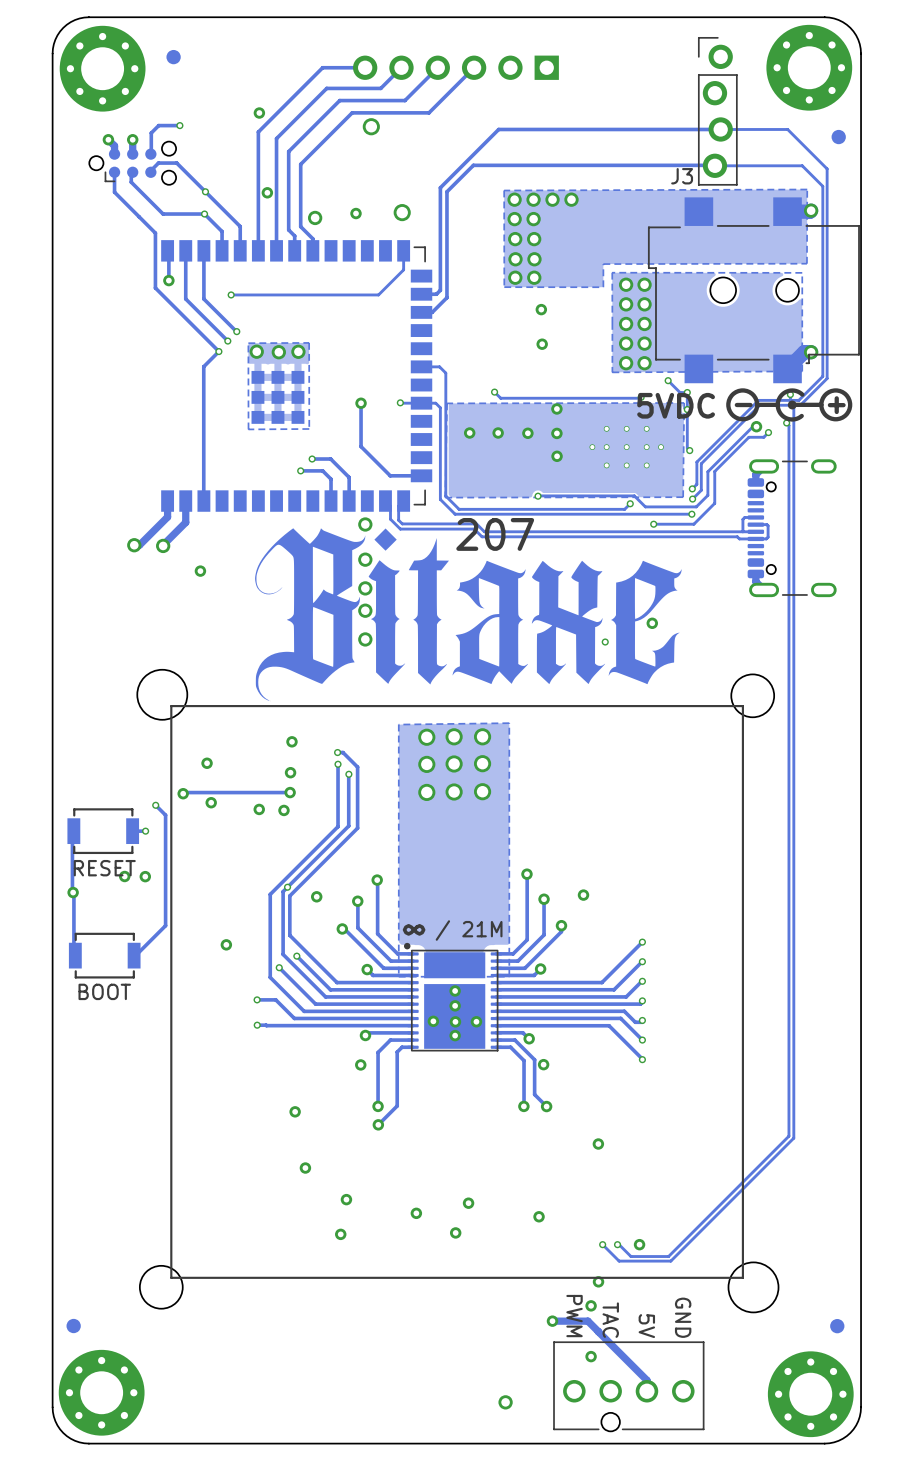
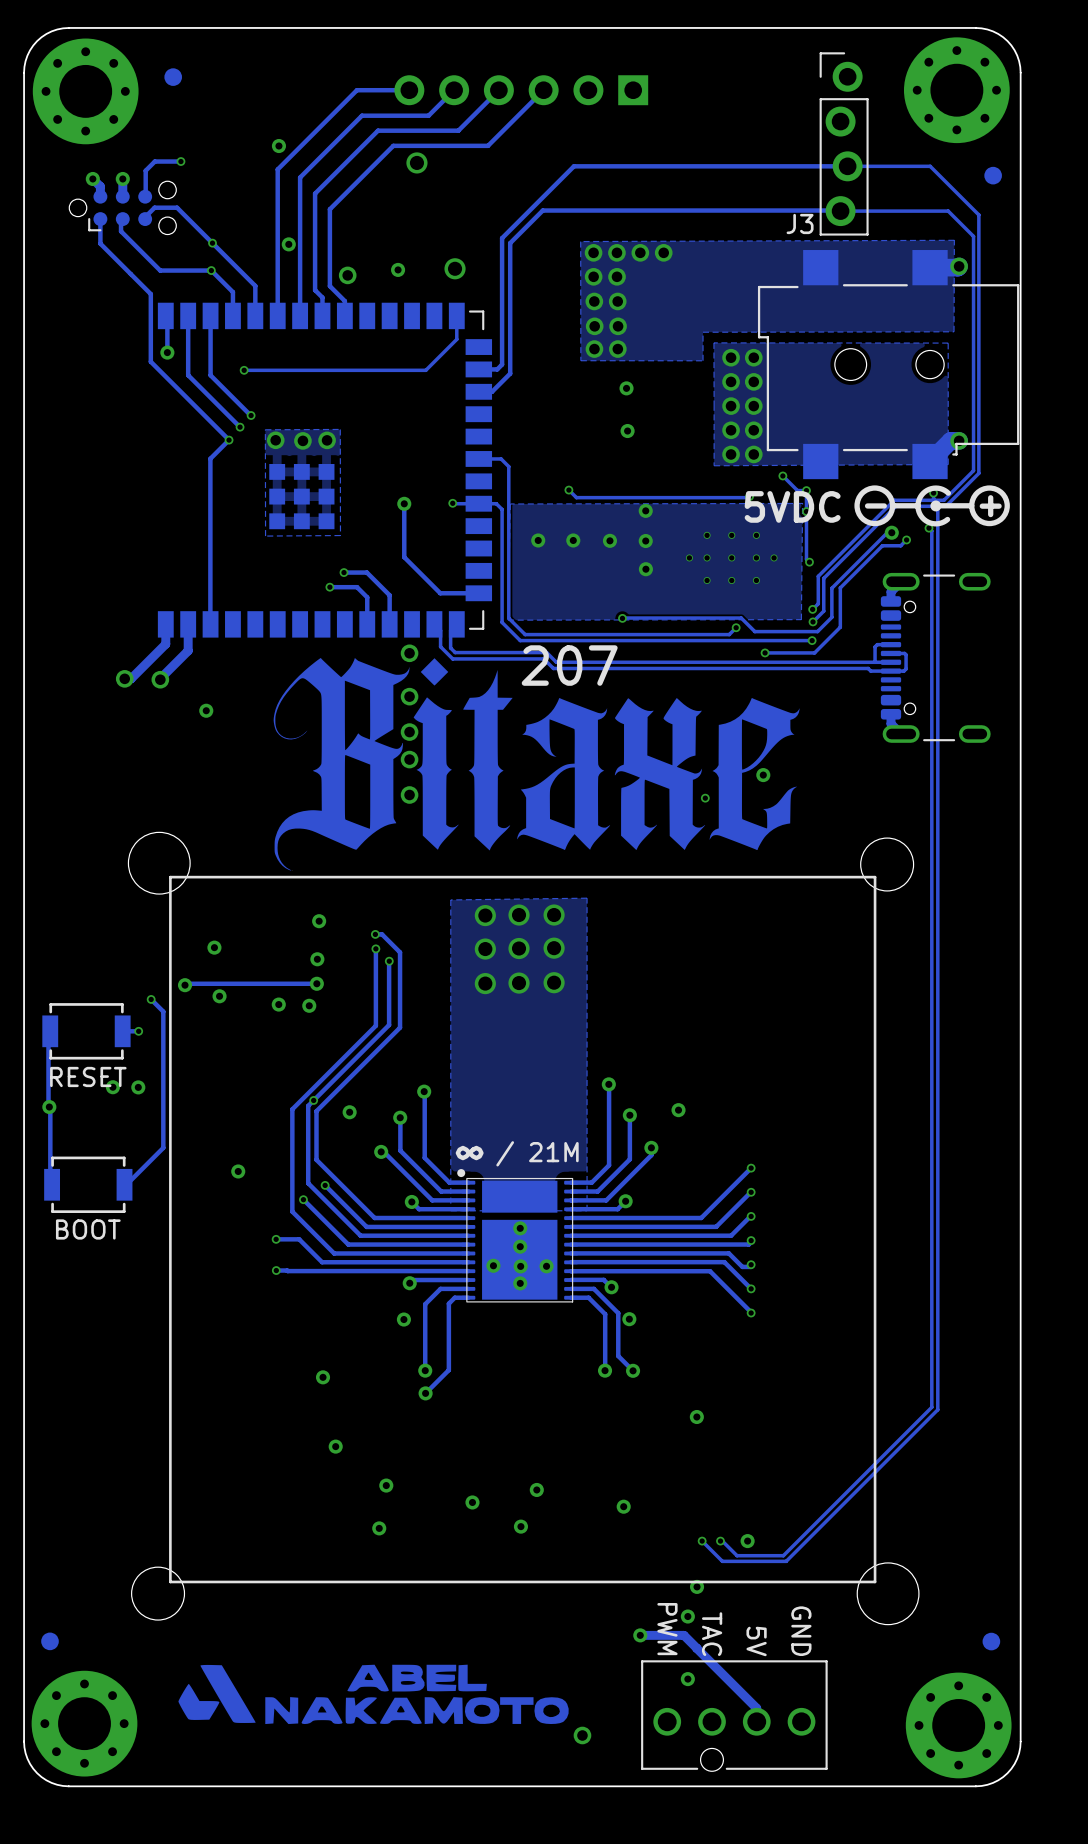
drawing: none -> [178, 1664, 569, 1725]

